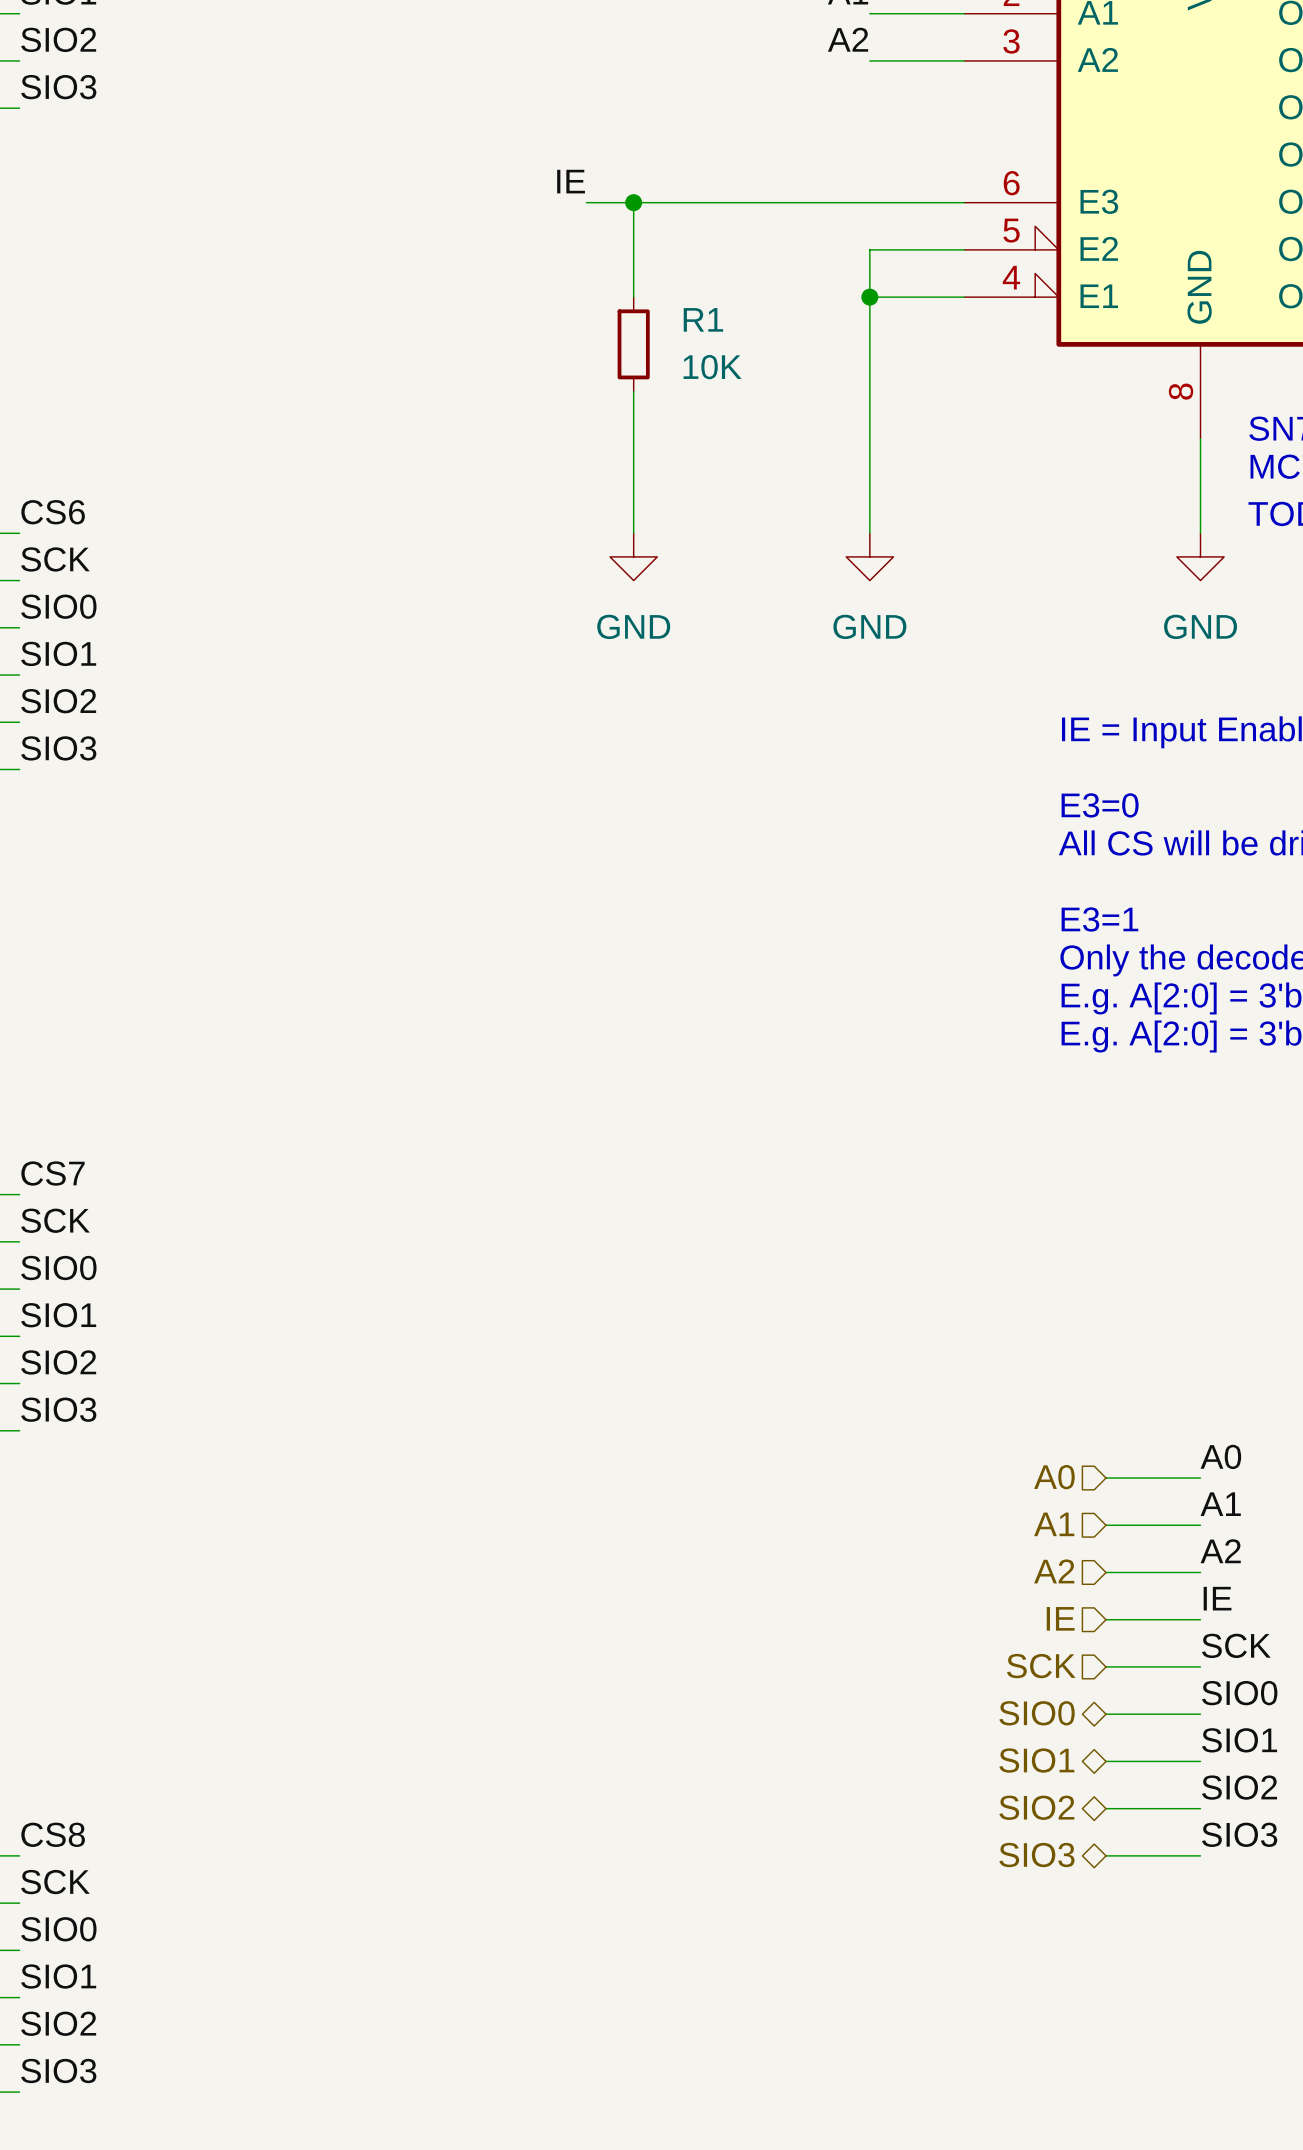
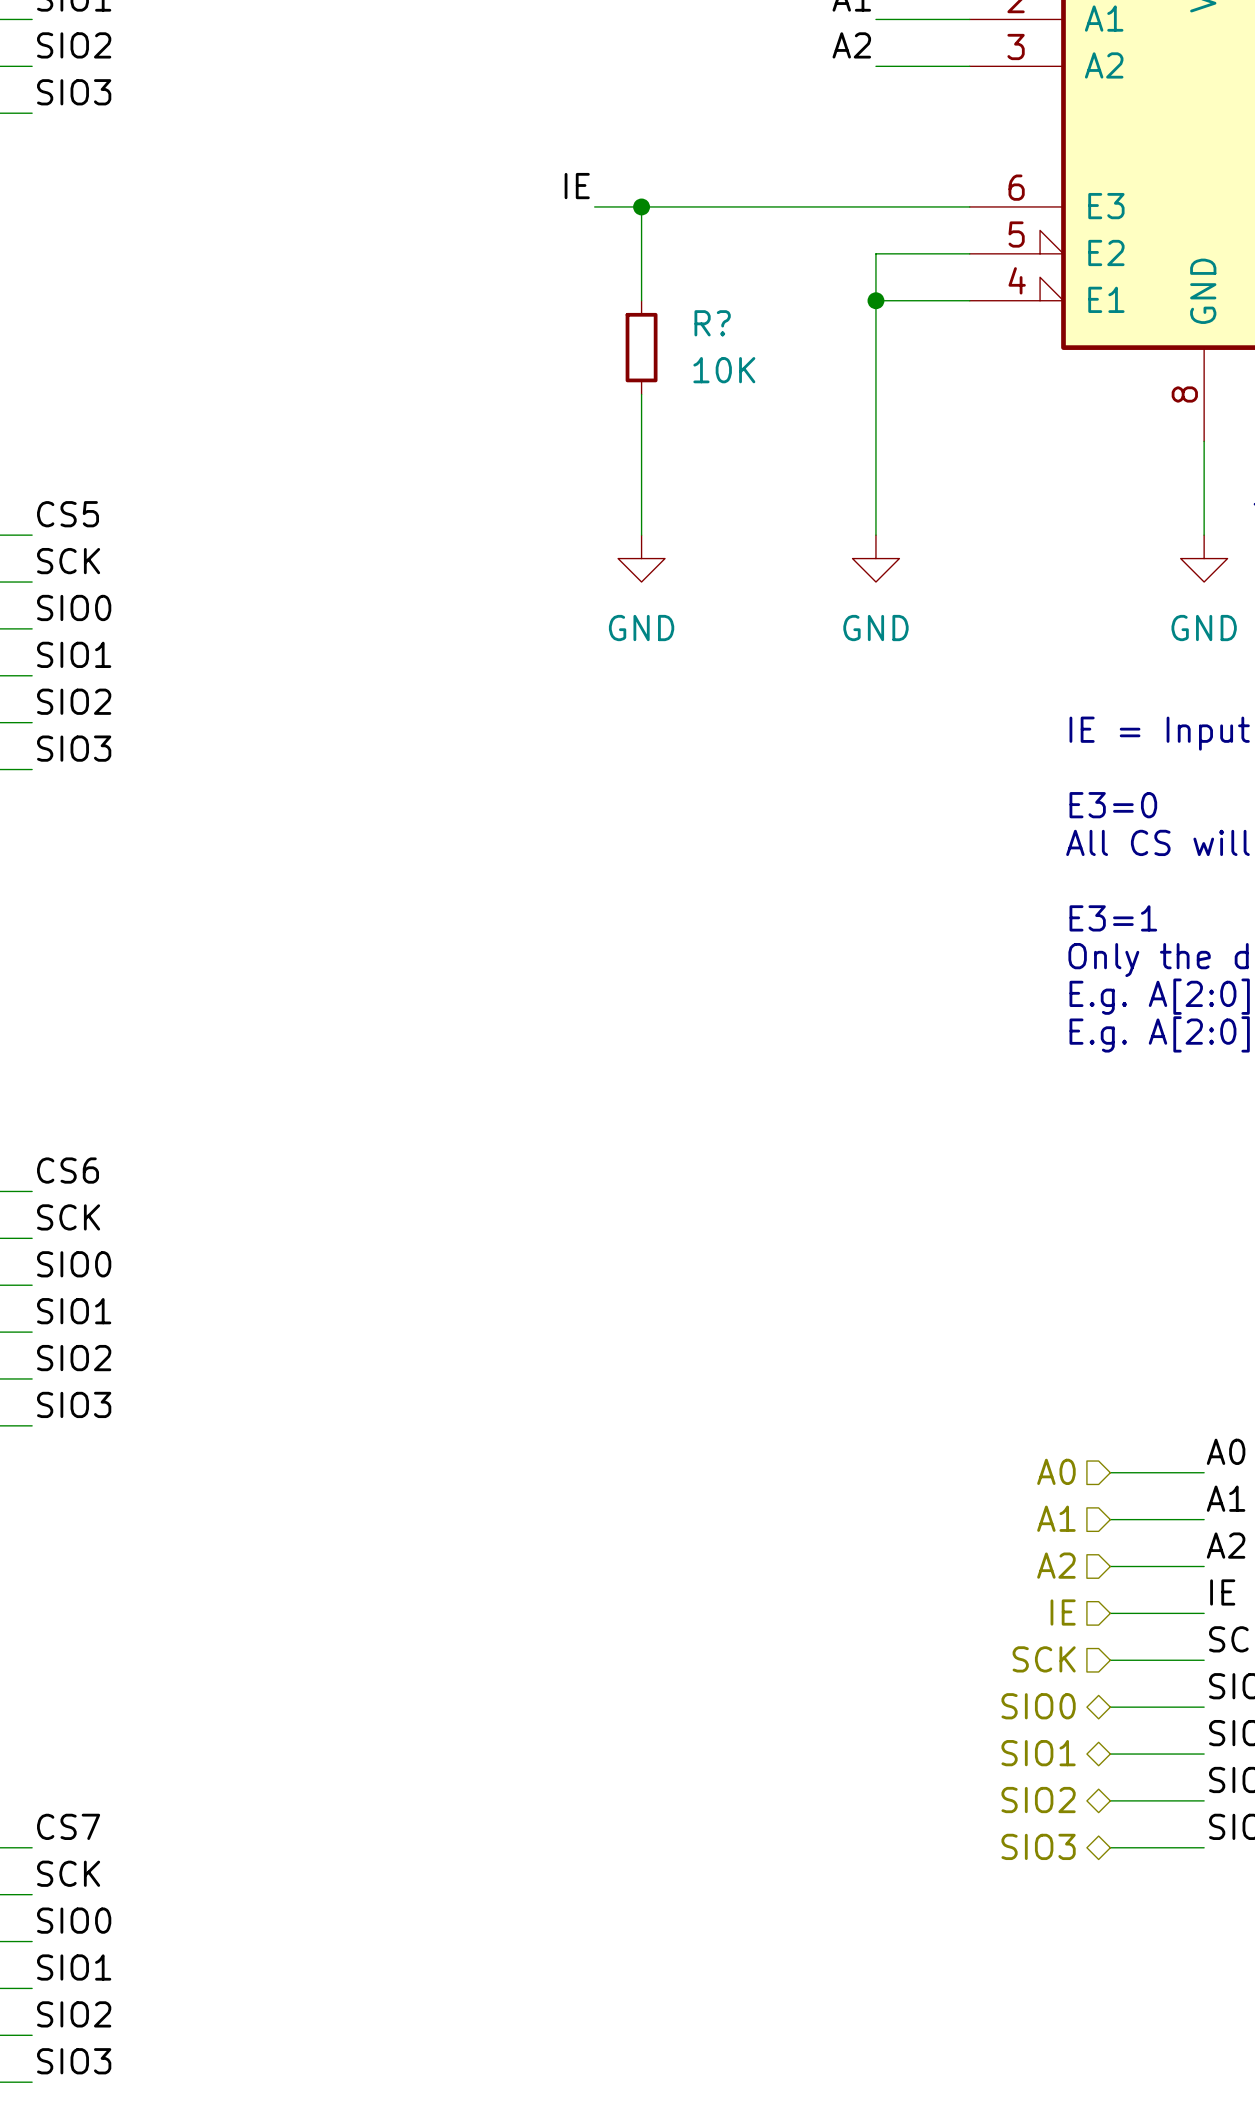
R1 name: R1 (703, 319) -> R? (712, 323)
label: CS6 (53, 512) -> CS5 (68, 514)
label: CS7 (53, 1173) -> CS6 (68, 1170)
label: CS8 (53, 1834) -> CS7 (68, 1826)

